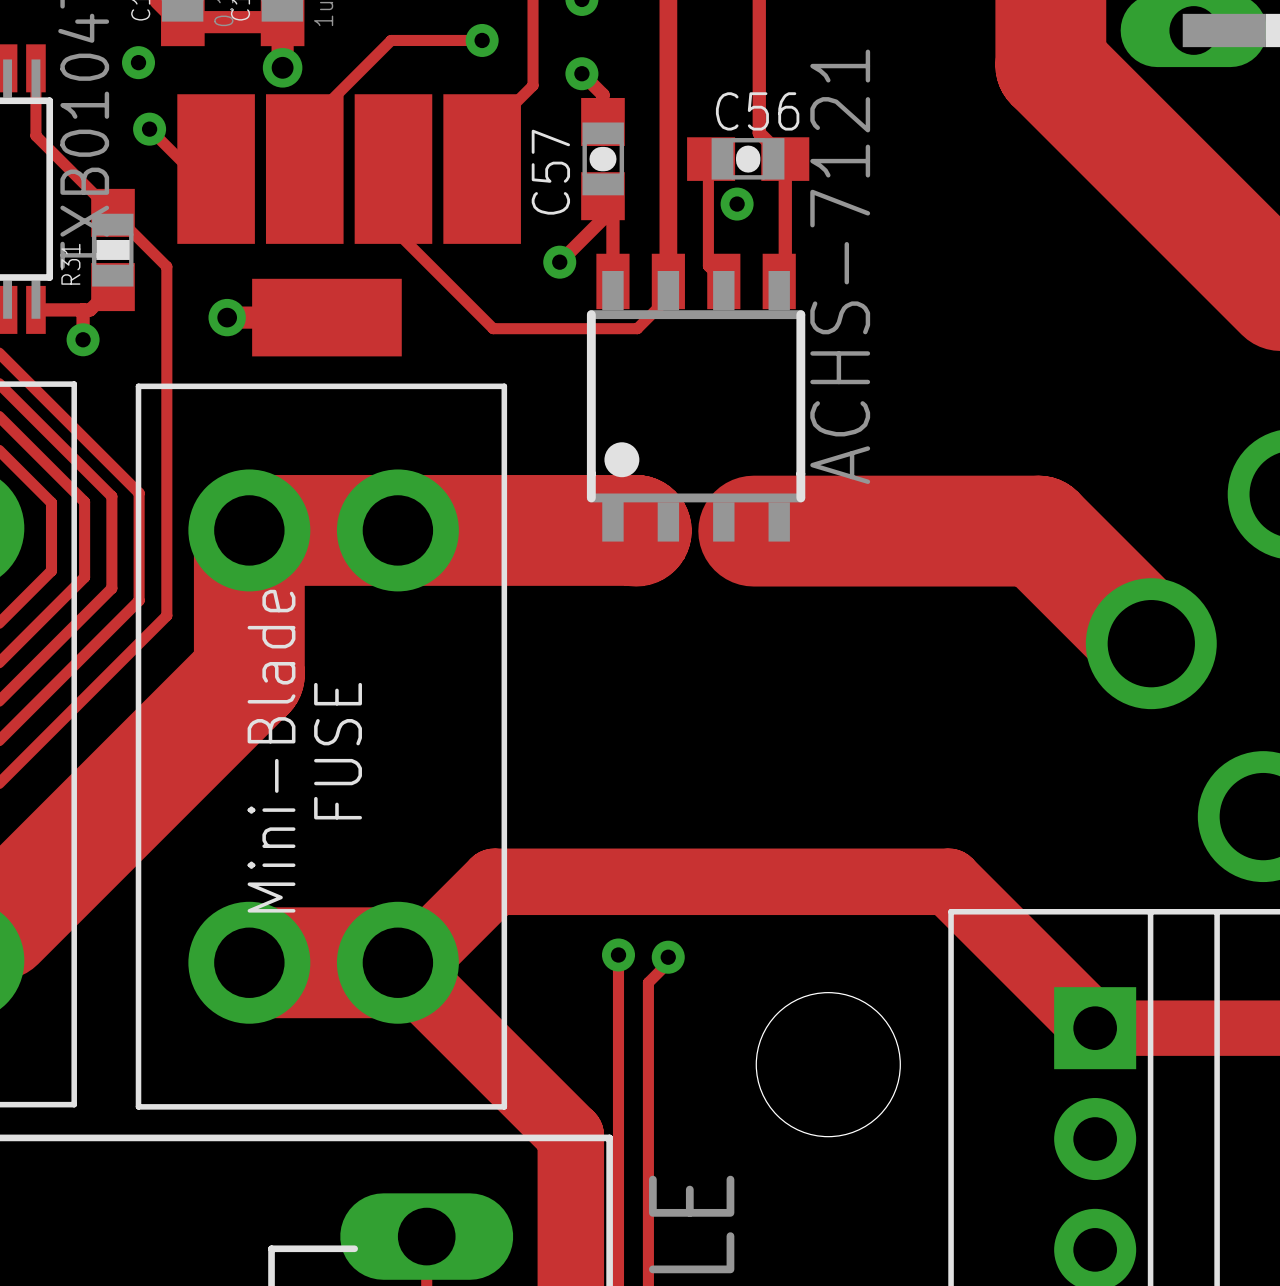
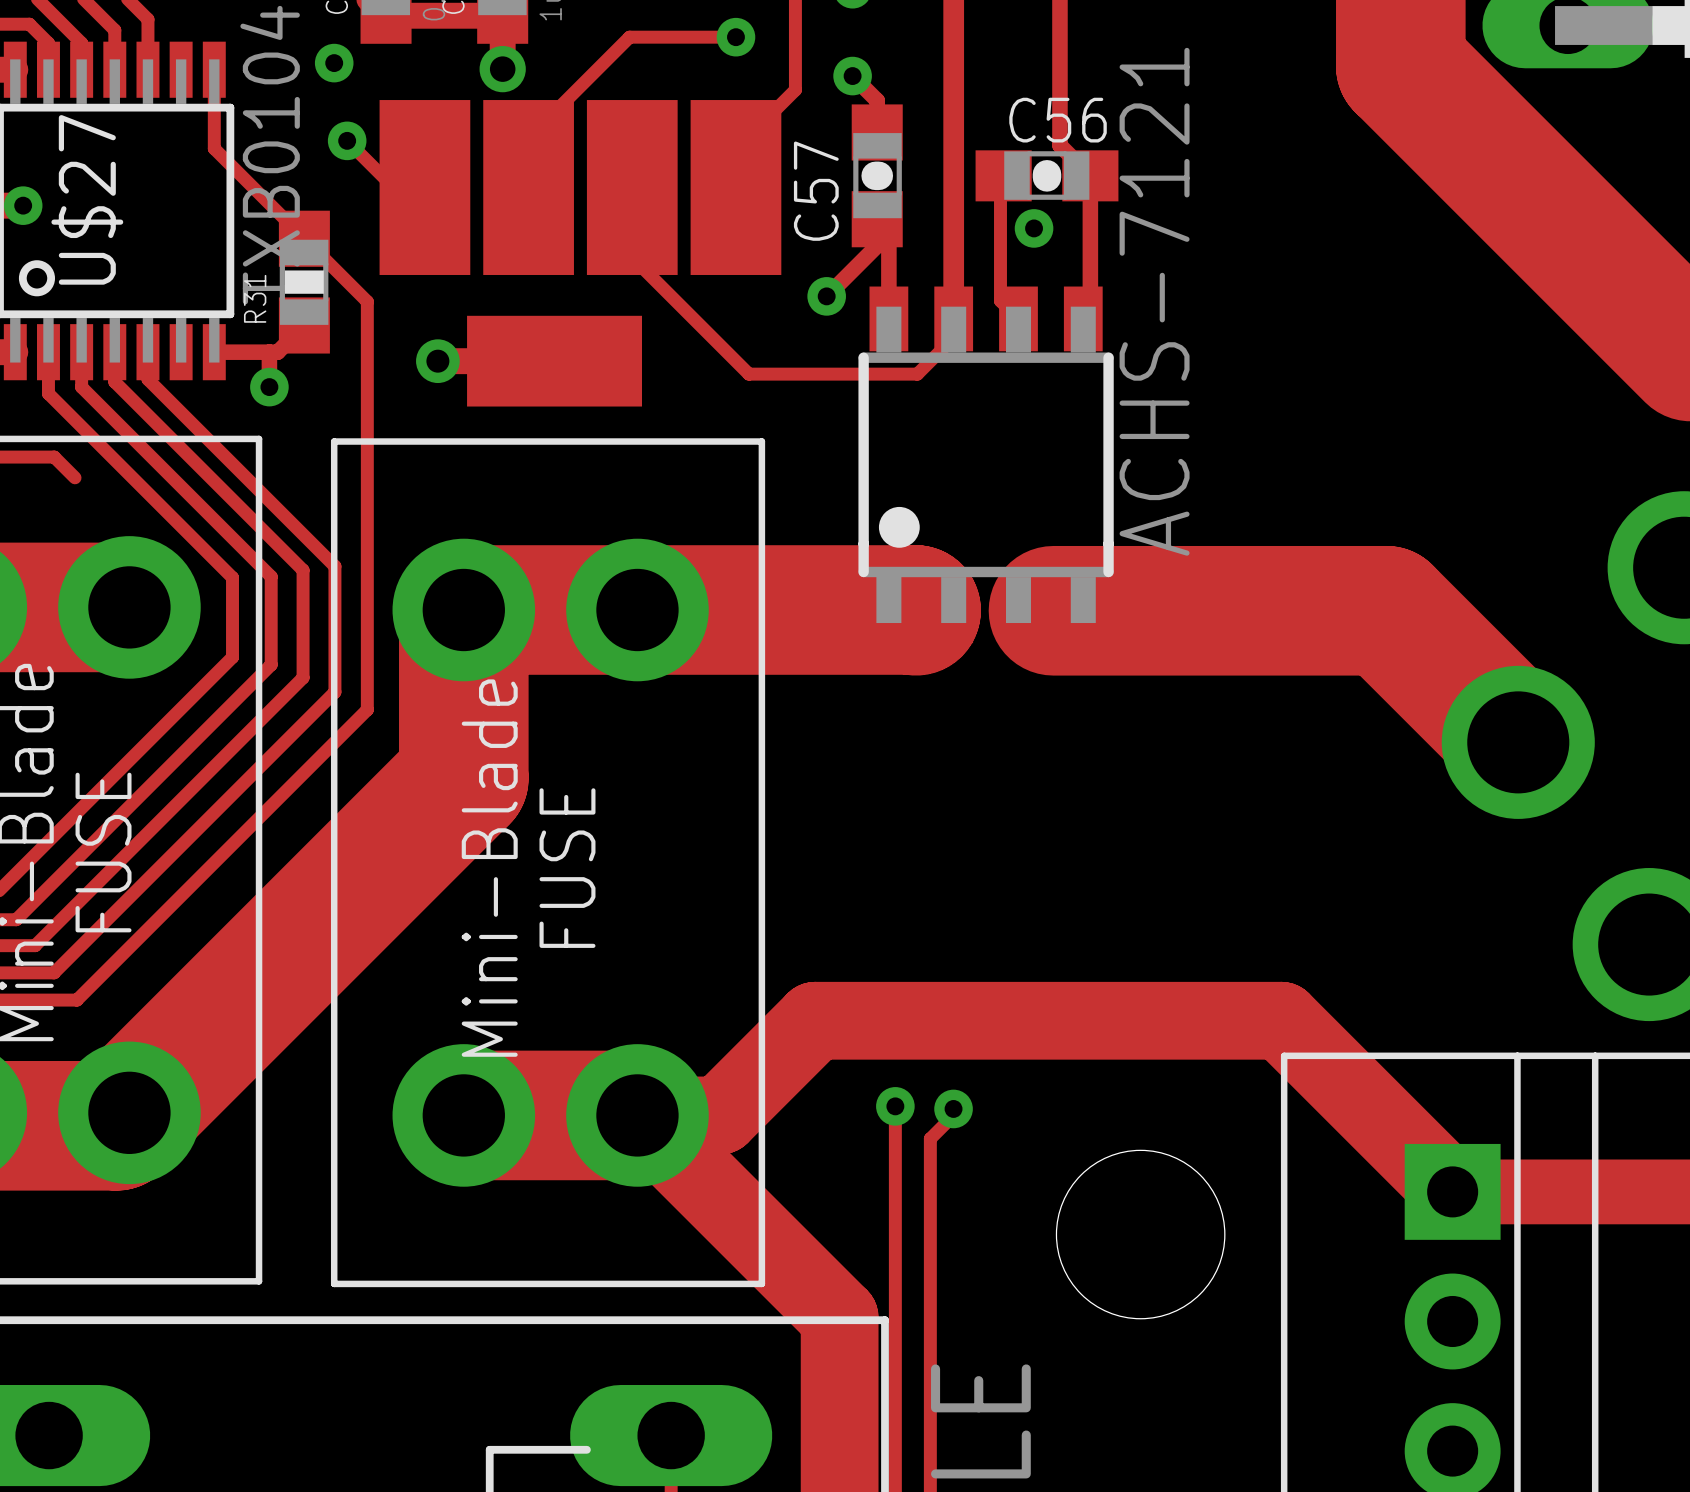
track: (549, 881) (494, 881) (413, 962) -> (815, 1020) (720, 1115) (655, 1115)

